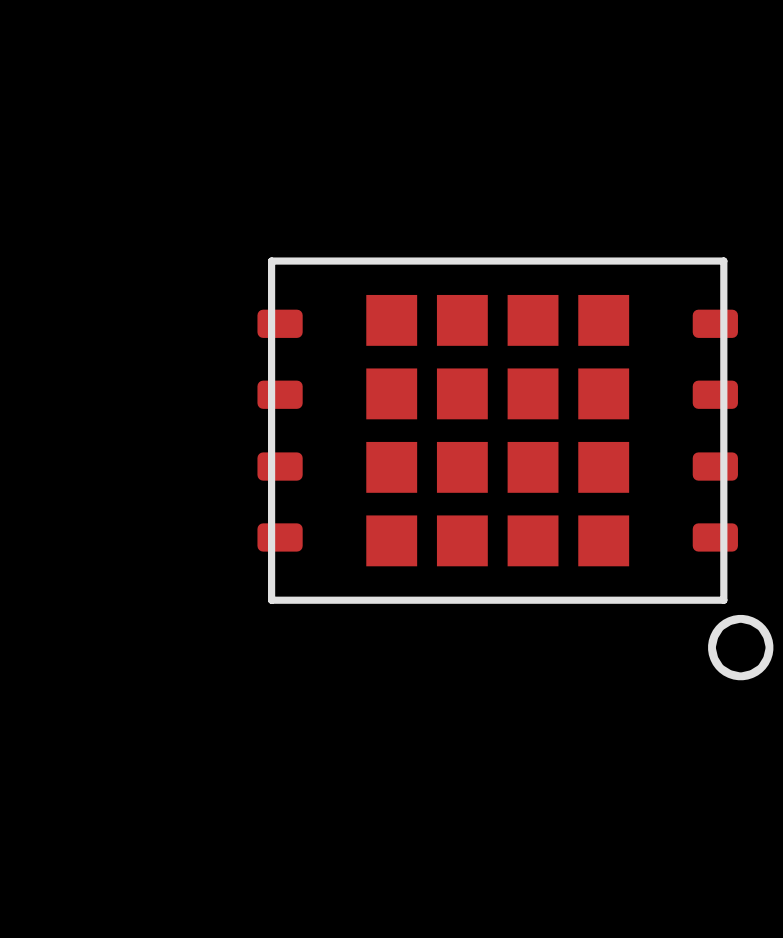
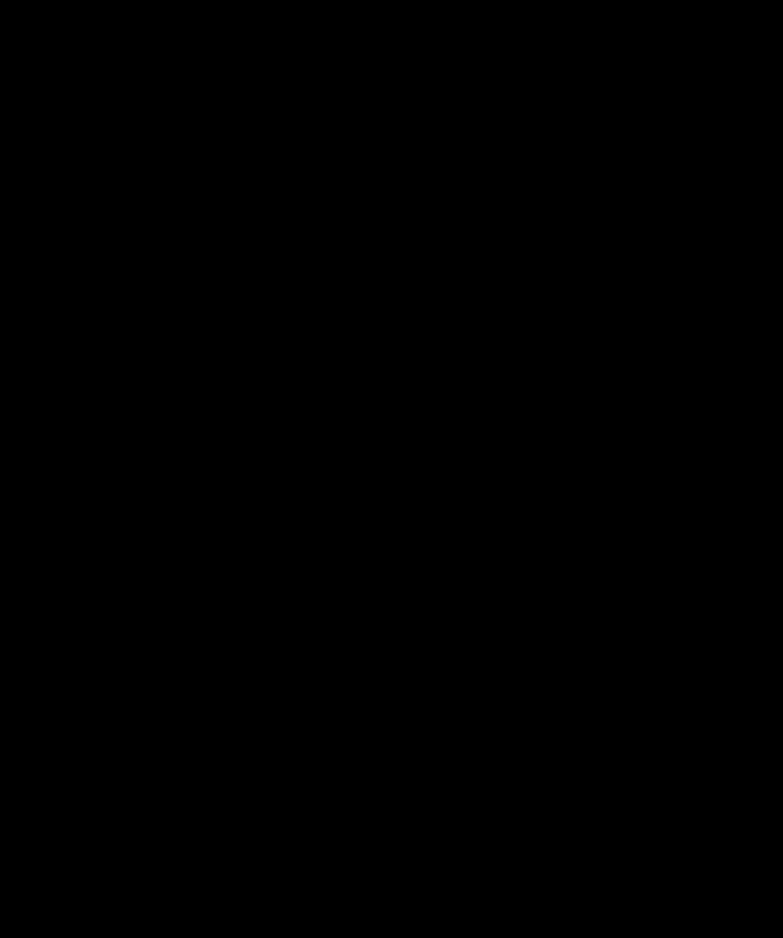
part: (515, 468) -> none

